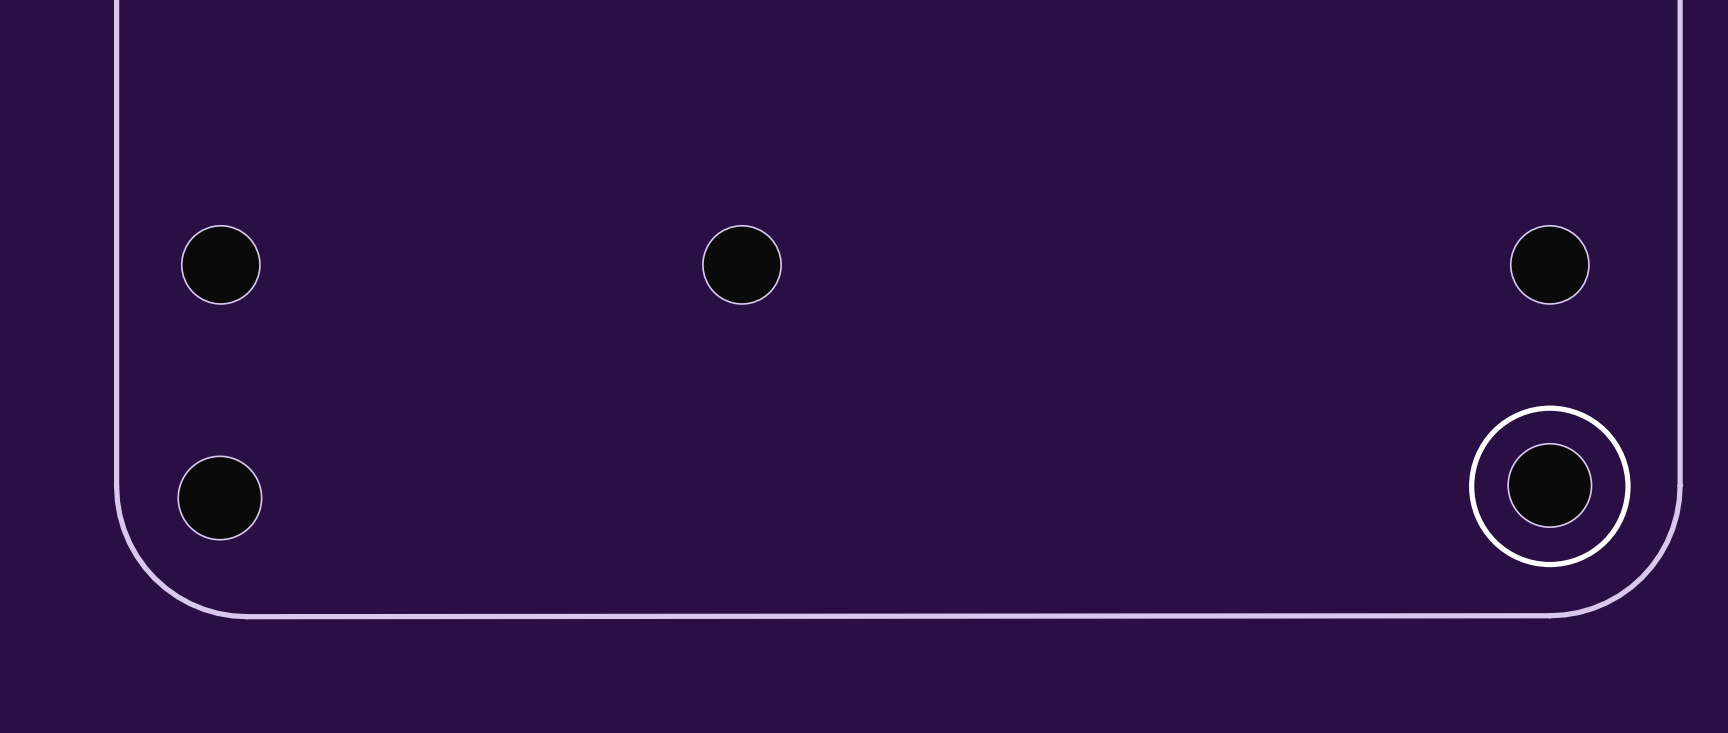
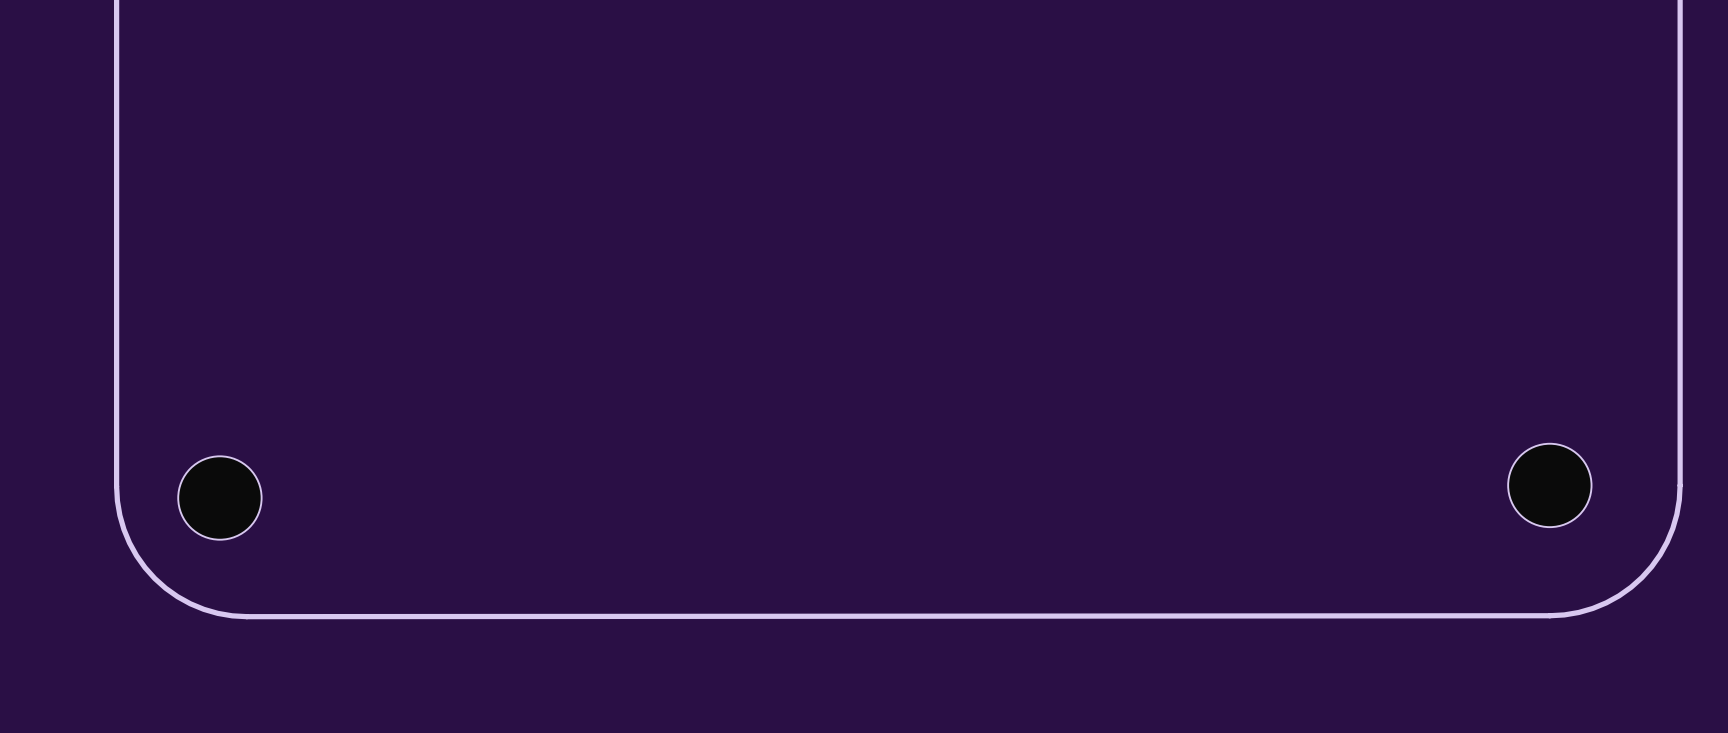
part: (220, 264) -> none
part: (742, 264) -> none
part: (1549, 264) -> none
drawing: [1469, 405, 1631, 568] -> none

